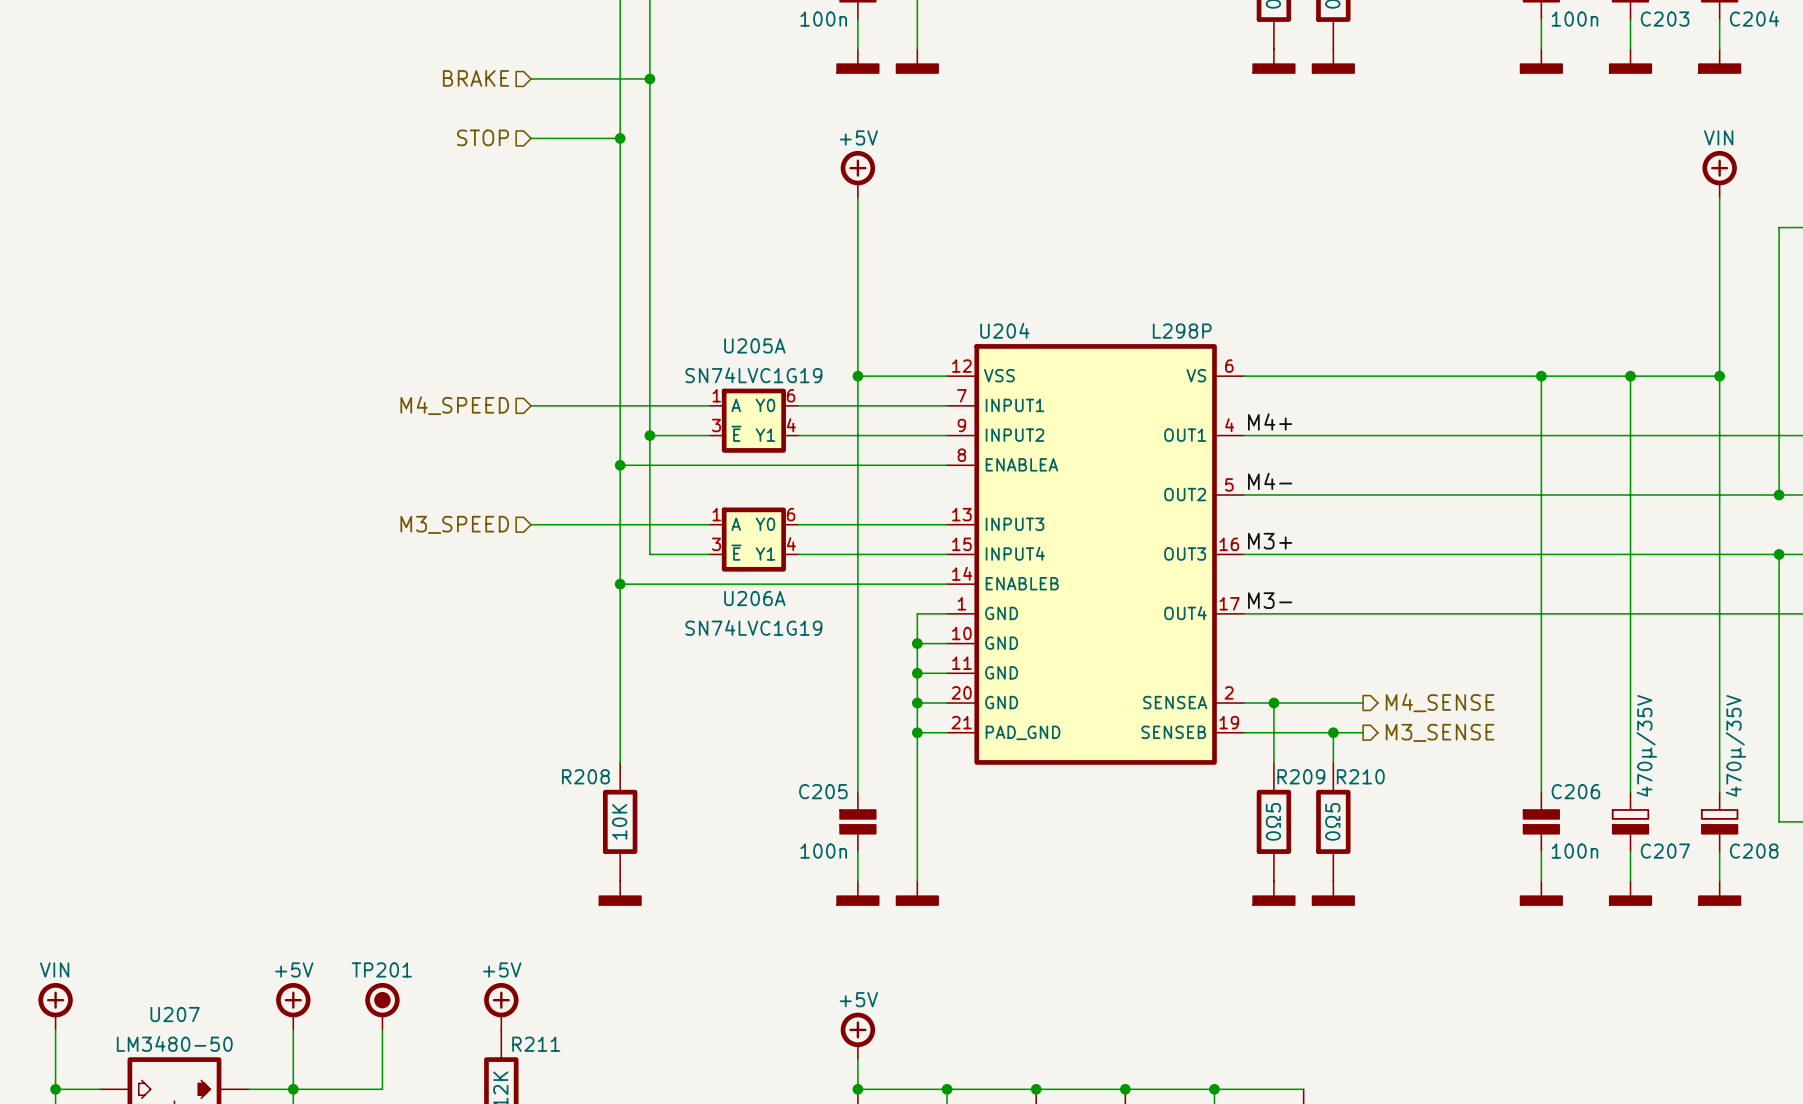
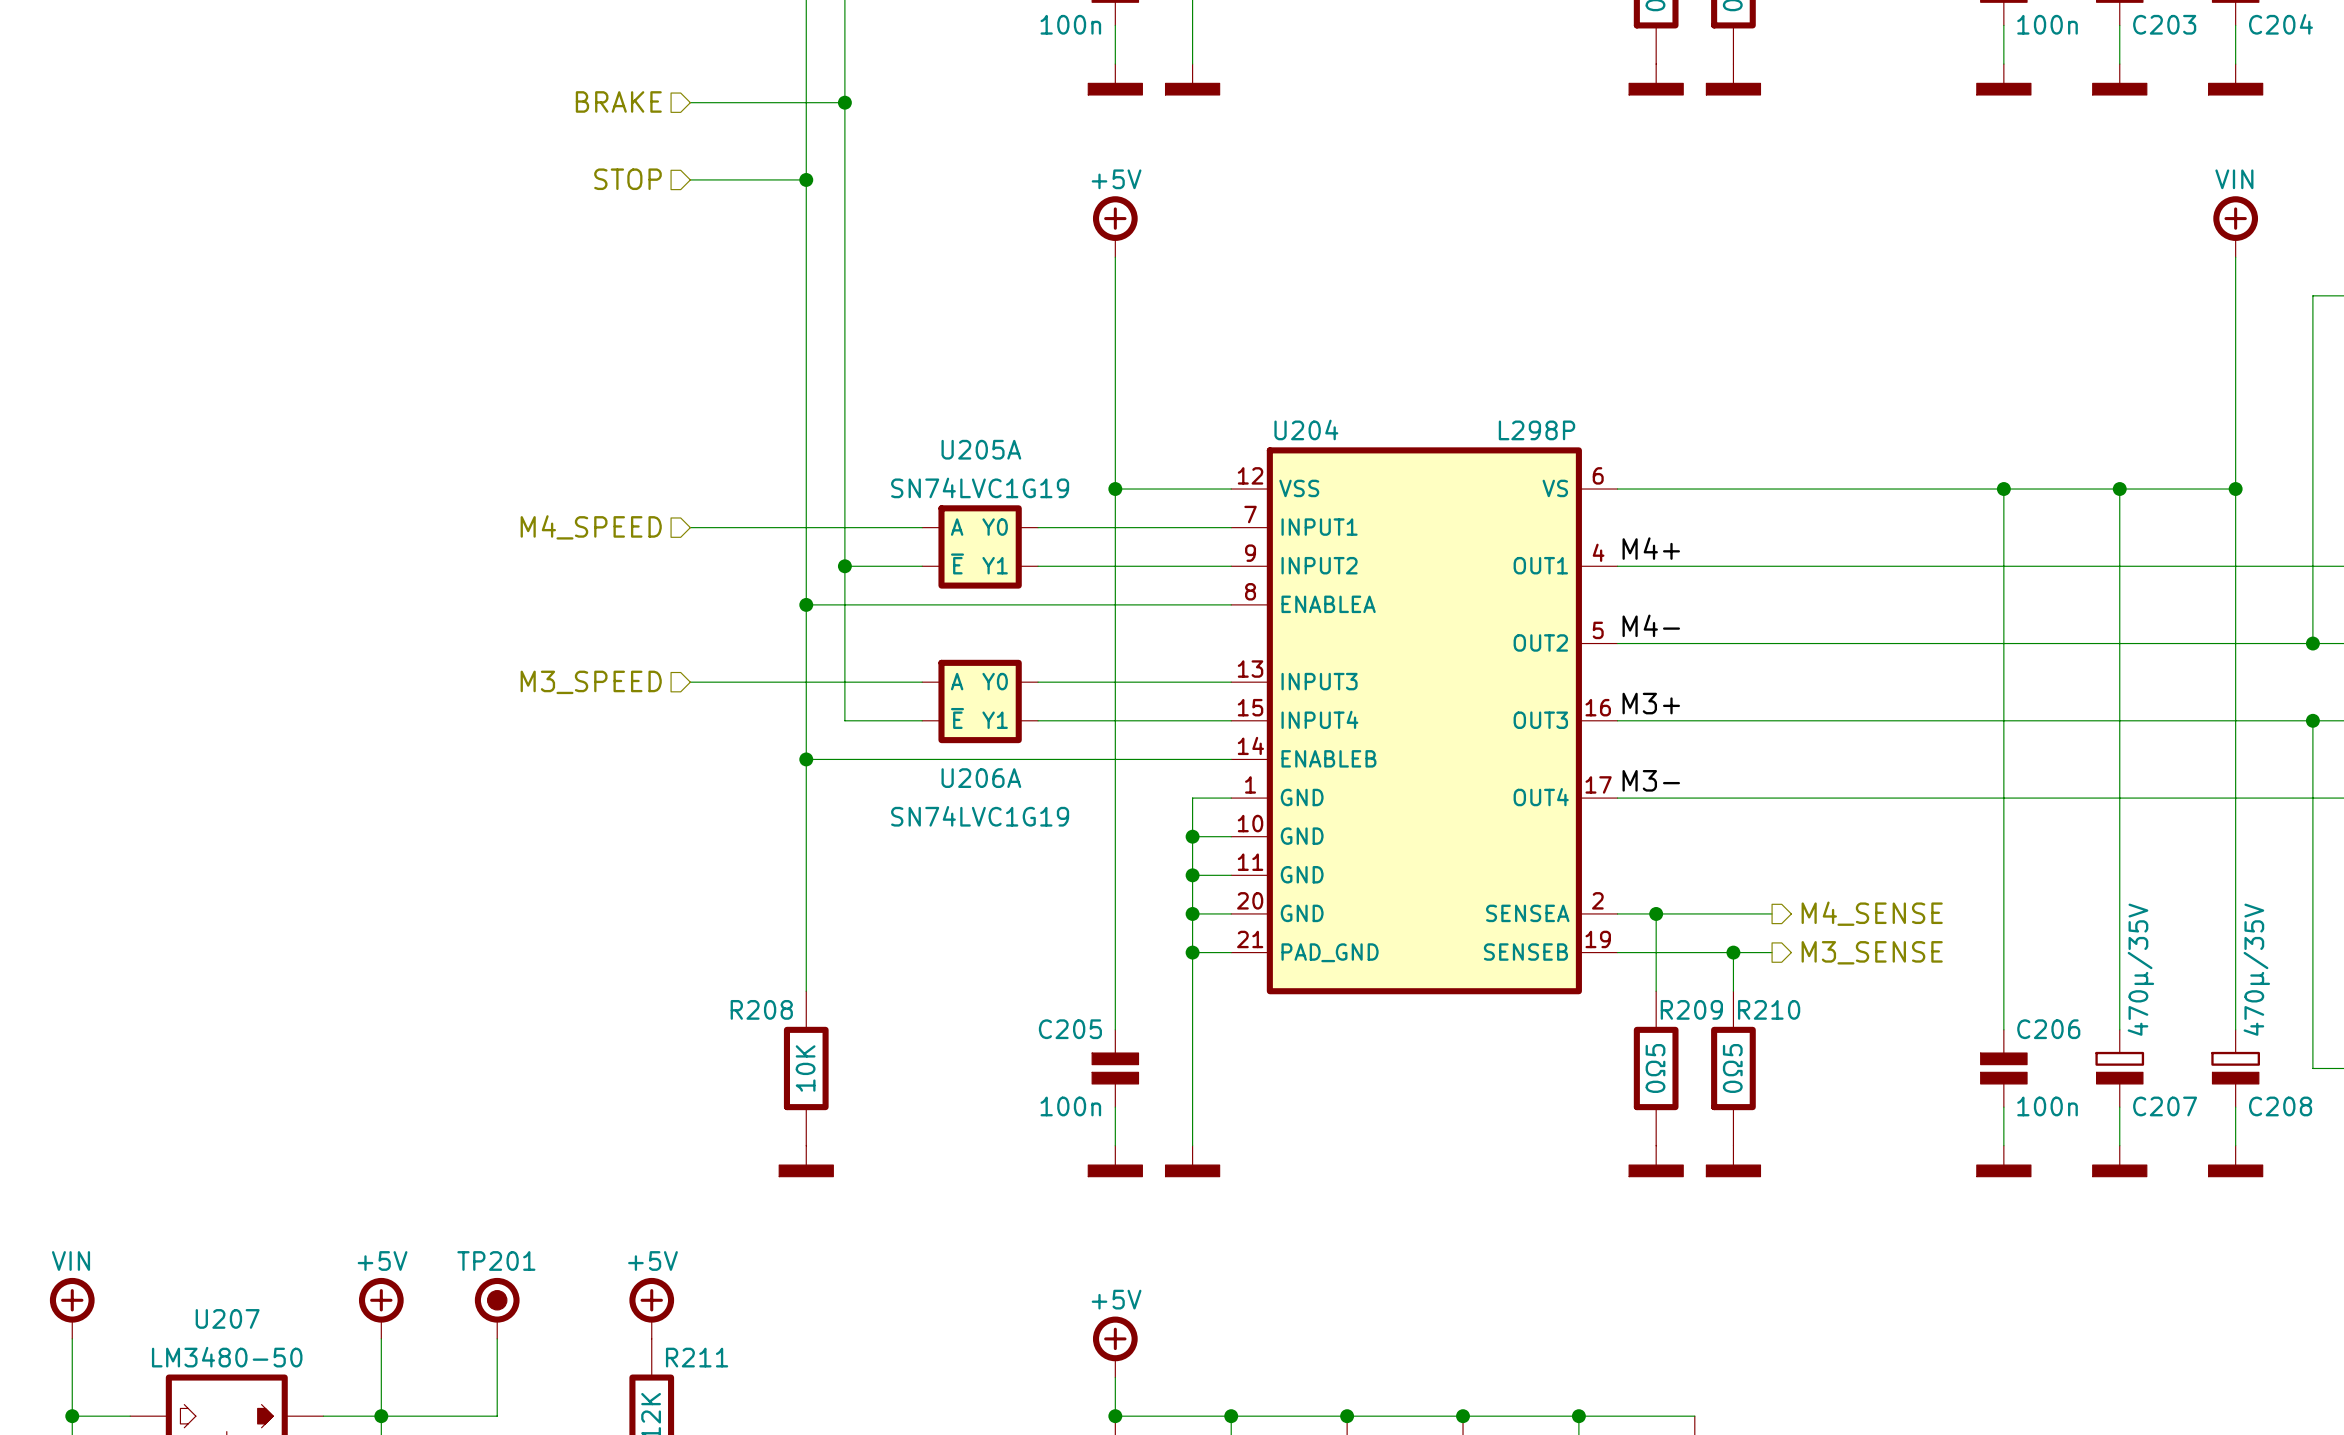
U205A pin number: 1 (716, 395) -> none
U205A pin number: 6 (791, 395) -> none
U205A pin number: 3 (716, 425) -> none
U205A pin number: 4 (791, 425) -> none
U206A pin number: 1 (716, 514) -> none
U206A pin number: 6 (791, 514) -> none
U206A pin number: 3 (716, 544) -> none
U206A pin number: 4 (791, 544) -> none

